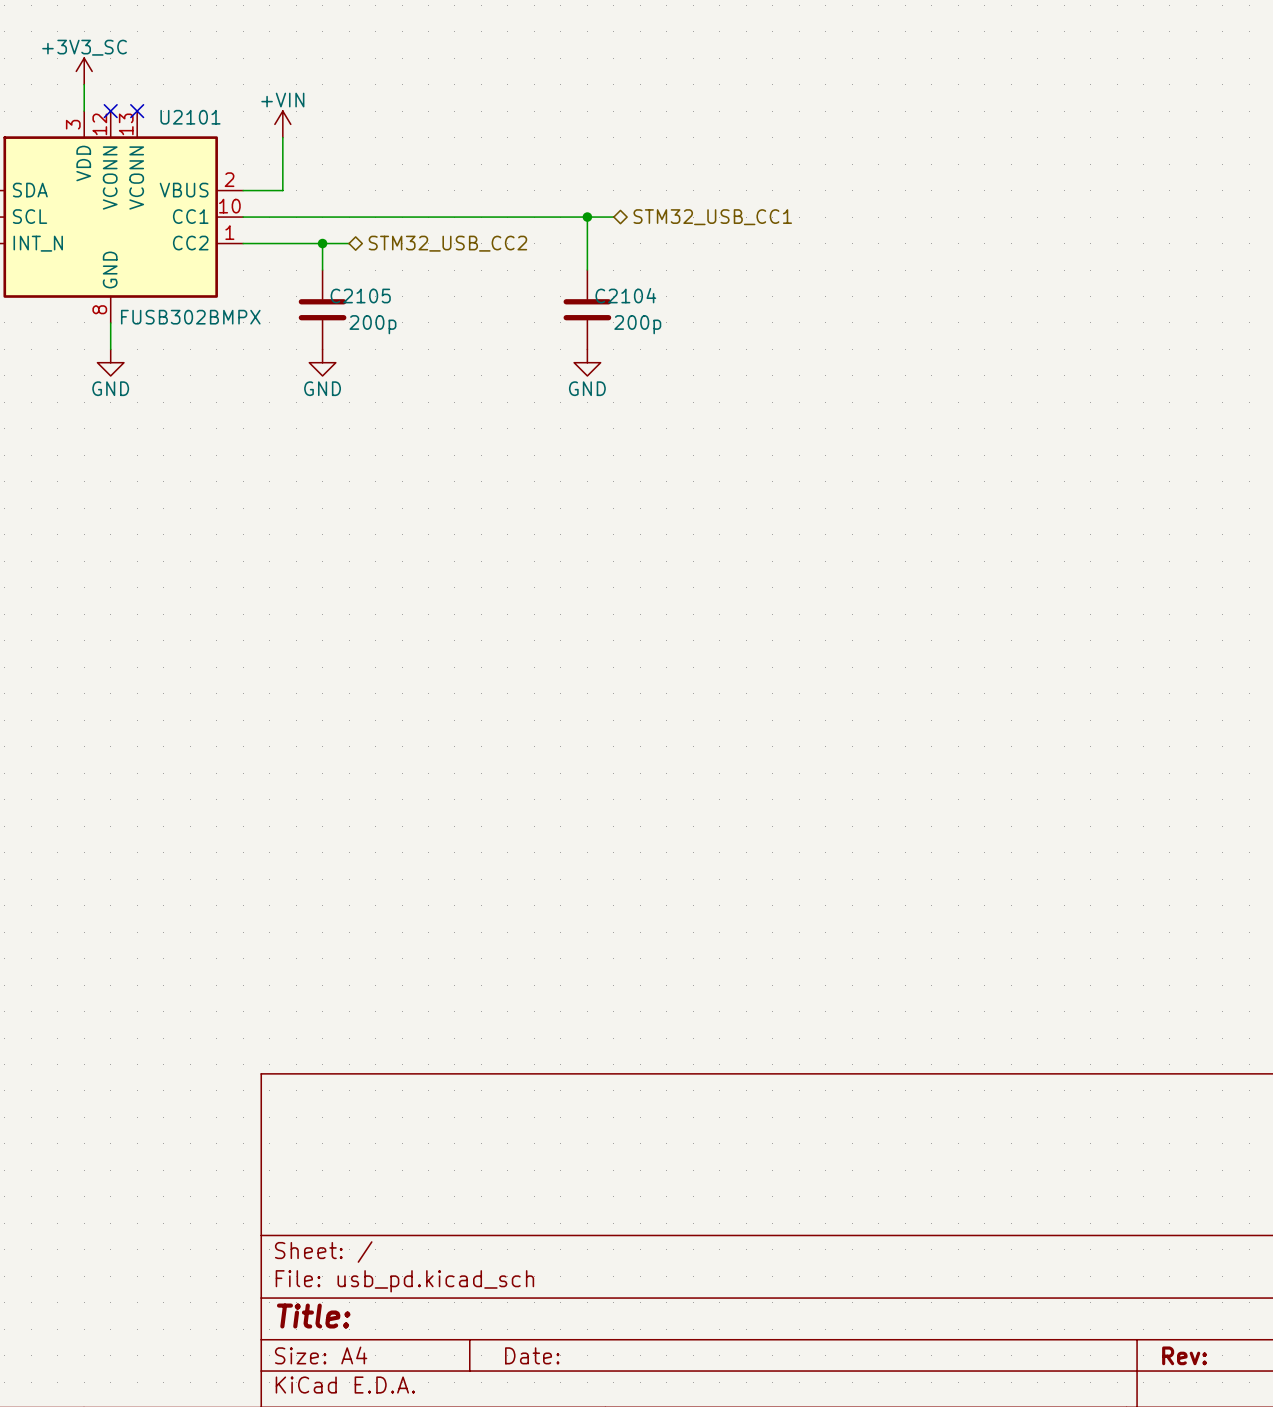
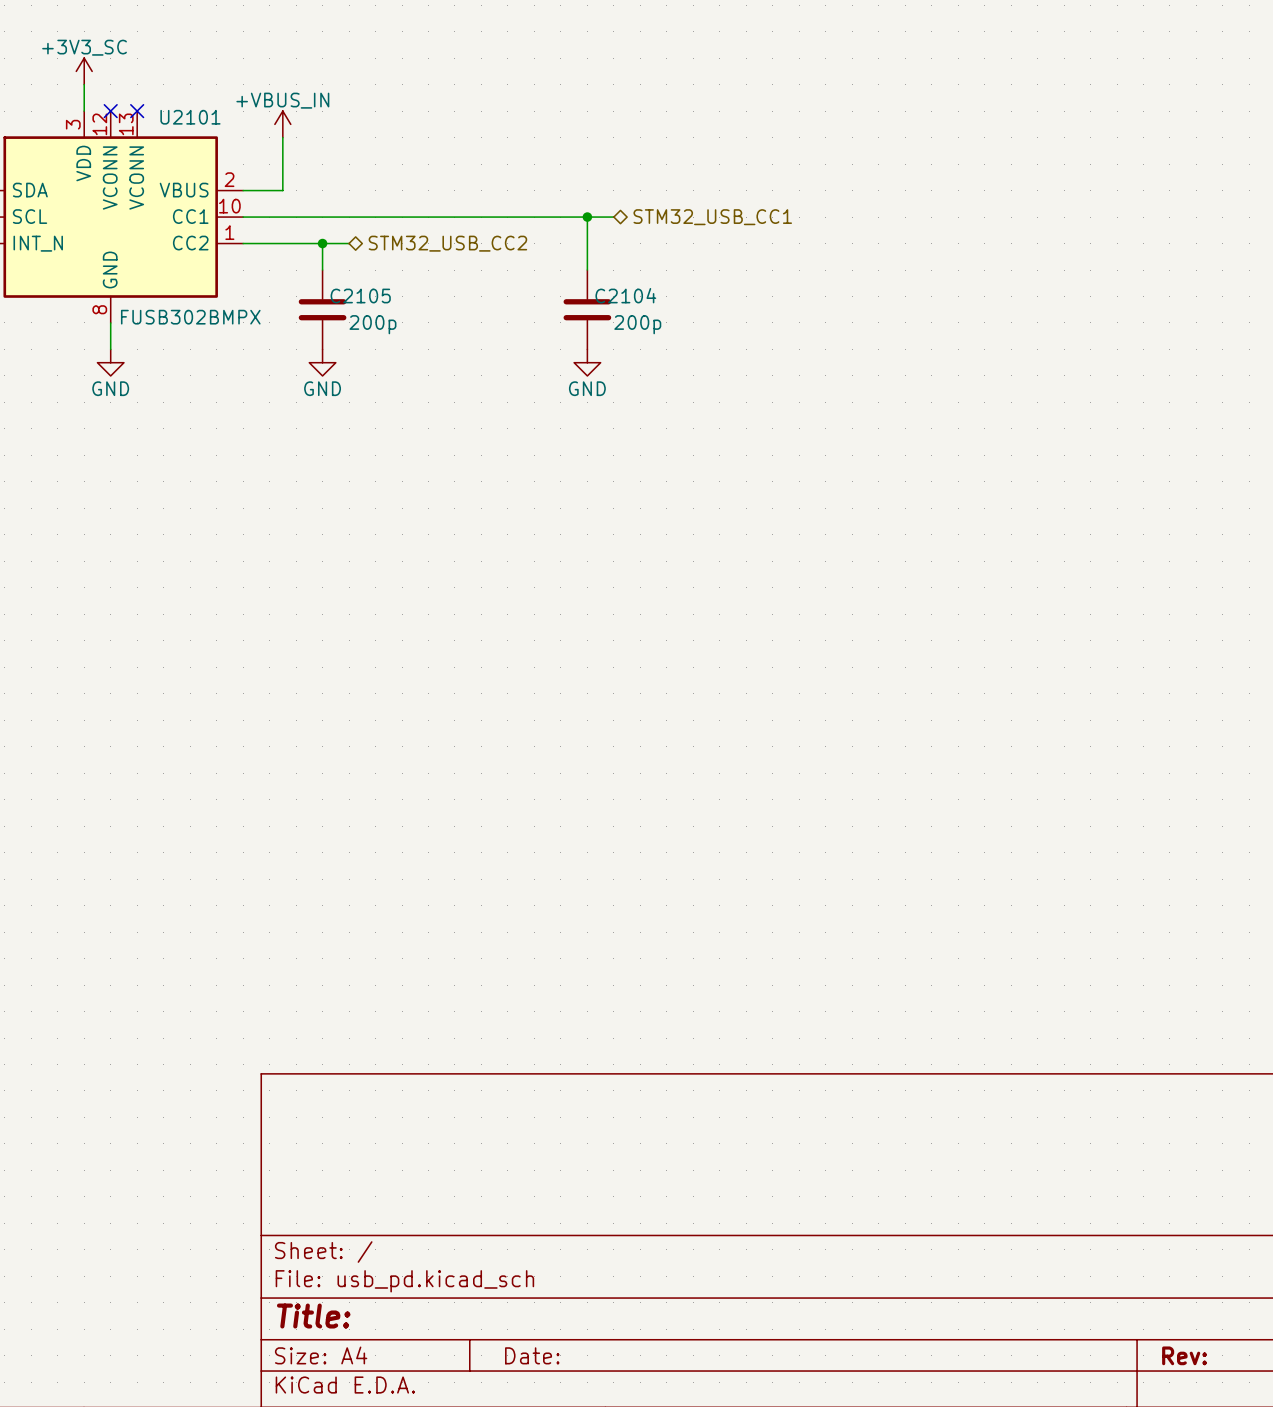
power symbol: +VIN (282, 124) -> +VBUS_IN (282, 124)

